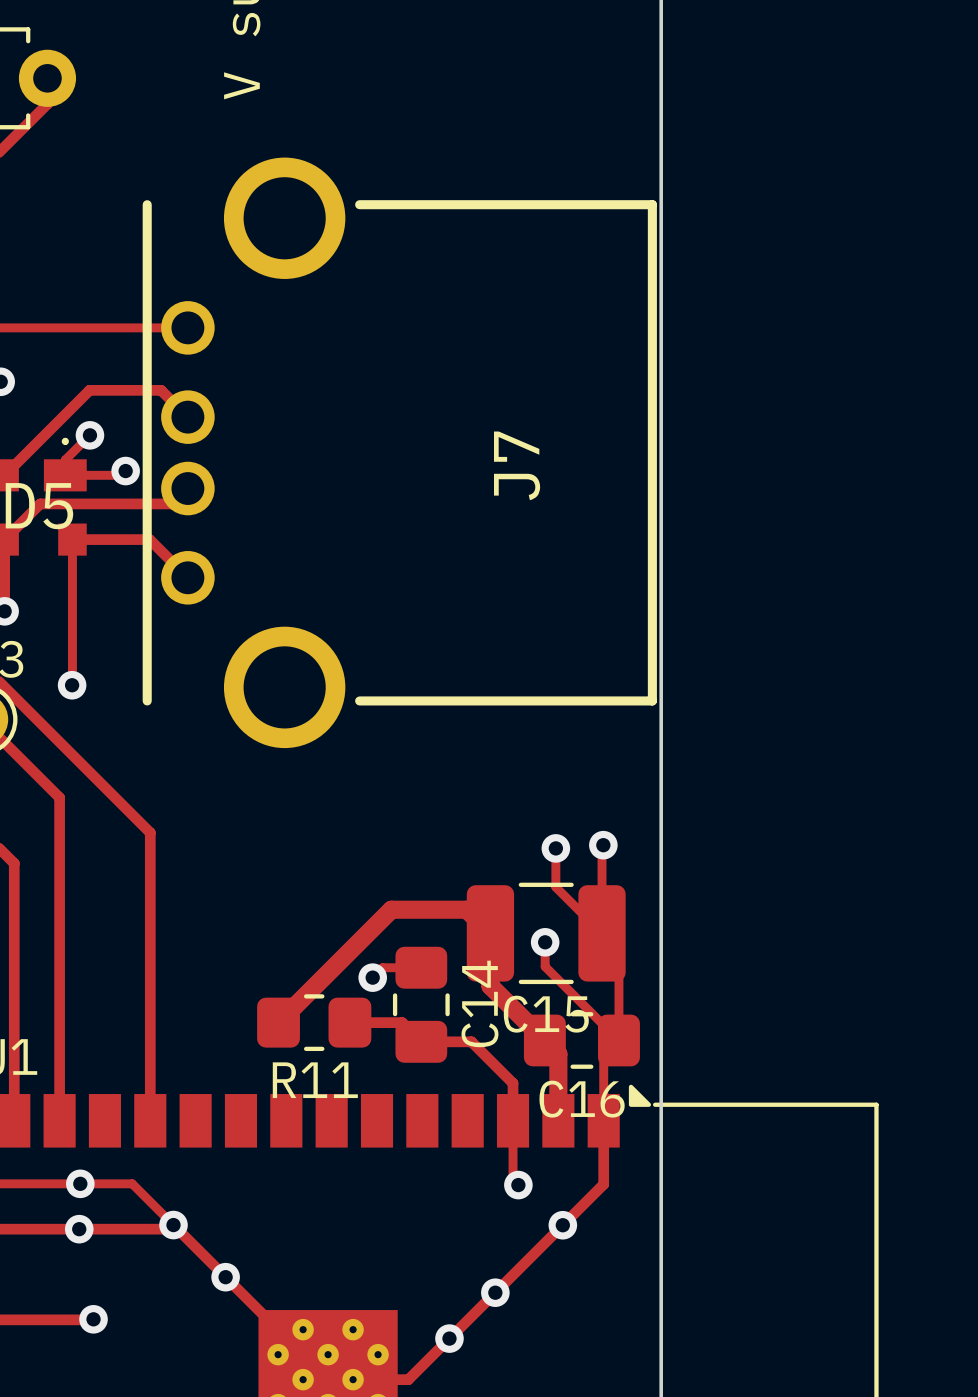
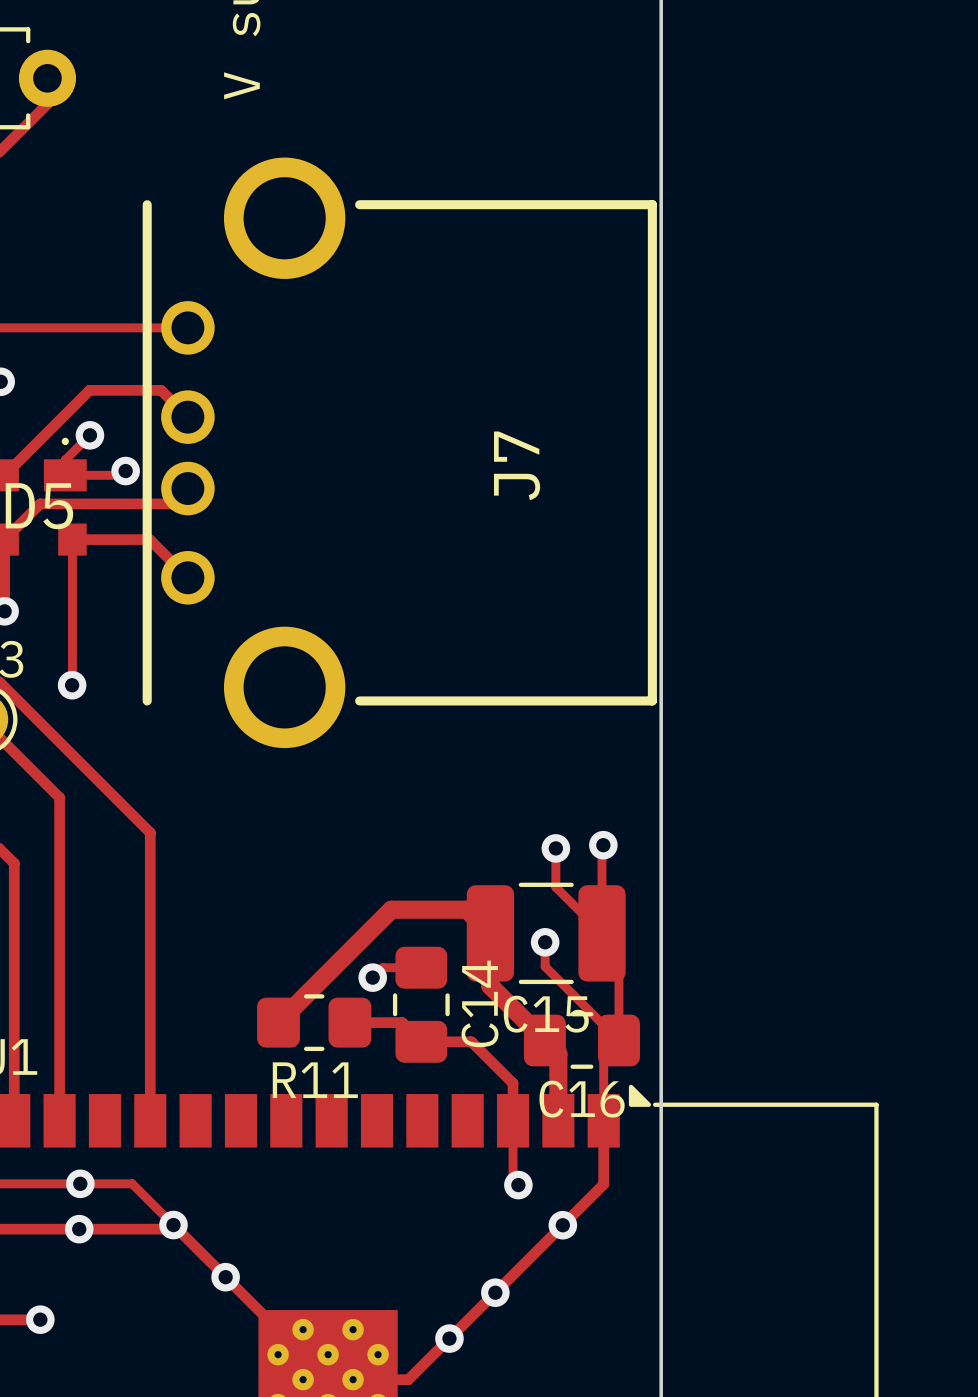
track: (93, 1319) (40, 1319) -> none
via position: (93, 1319) -> (40, 1319)

